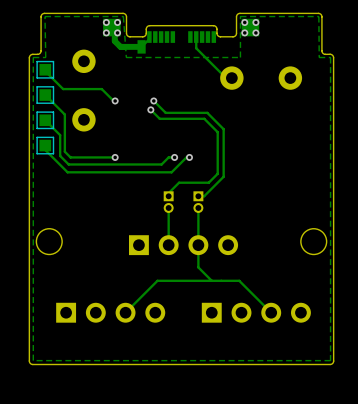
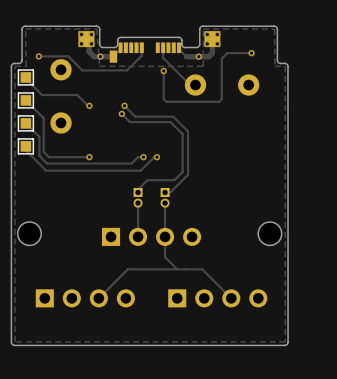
track: none -> (212, 39) (212, 53) (208, 56) (186, 56) (179, 47)
track: none -> (141, 47) (141, 55) (126, 70) (82, 70) (68, 56) (38, 56)
track: none -> (251, 53) (227, 53) (221, 58) (221, 99) (219, 101) (166, 101) (163, 99) (163, 70)
via: none -> (251, 53)
via: none -> (38, 56)
via: none -> (100, 56)
via: none -> (198, 56)
via: none -> (163, 70)

